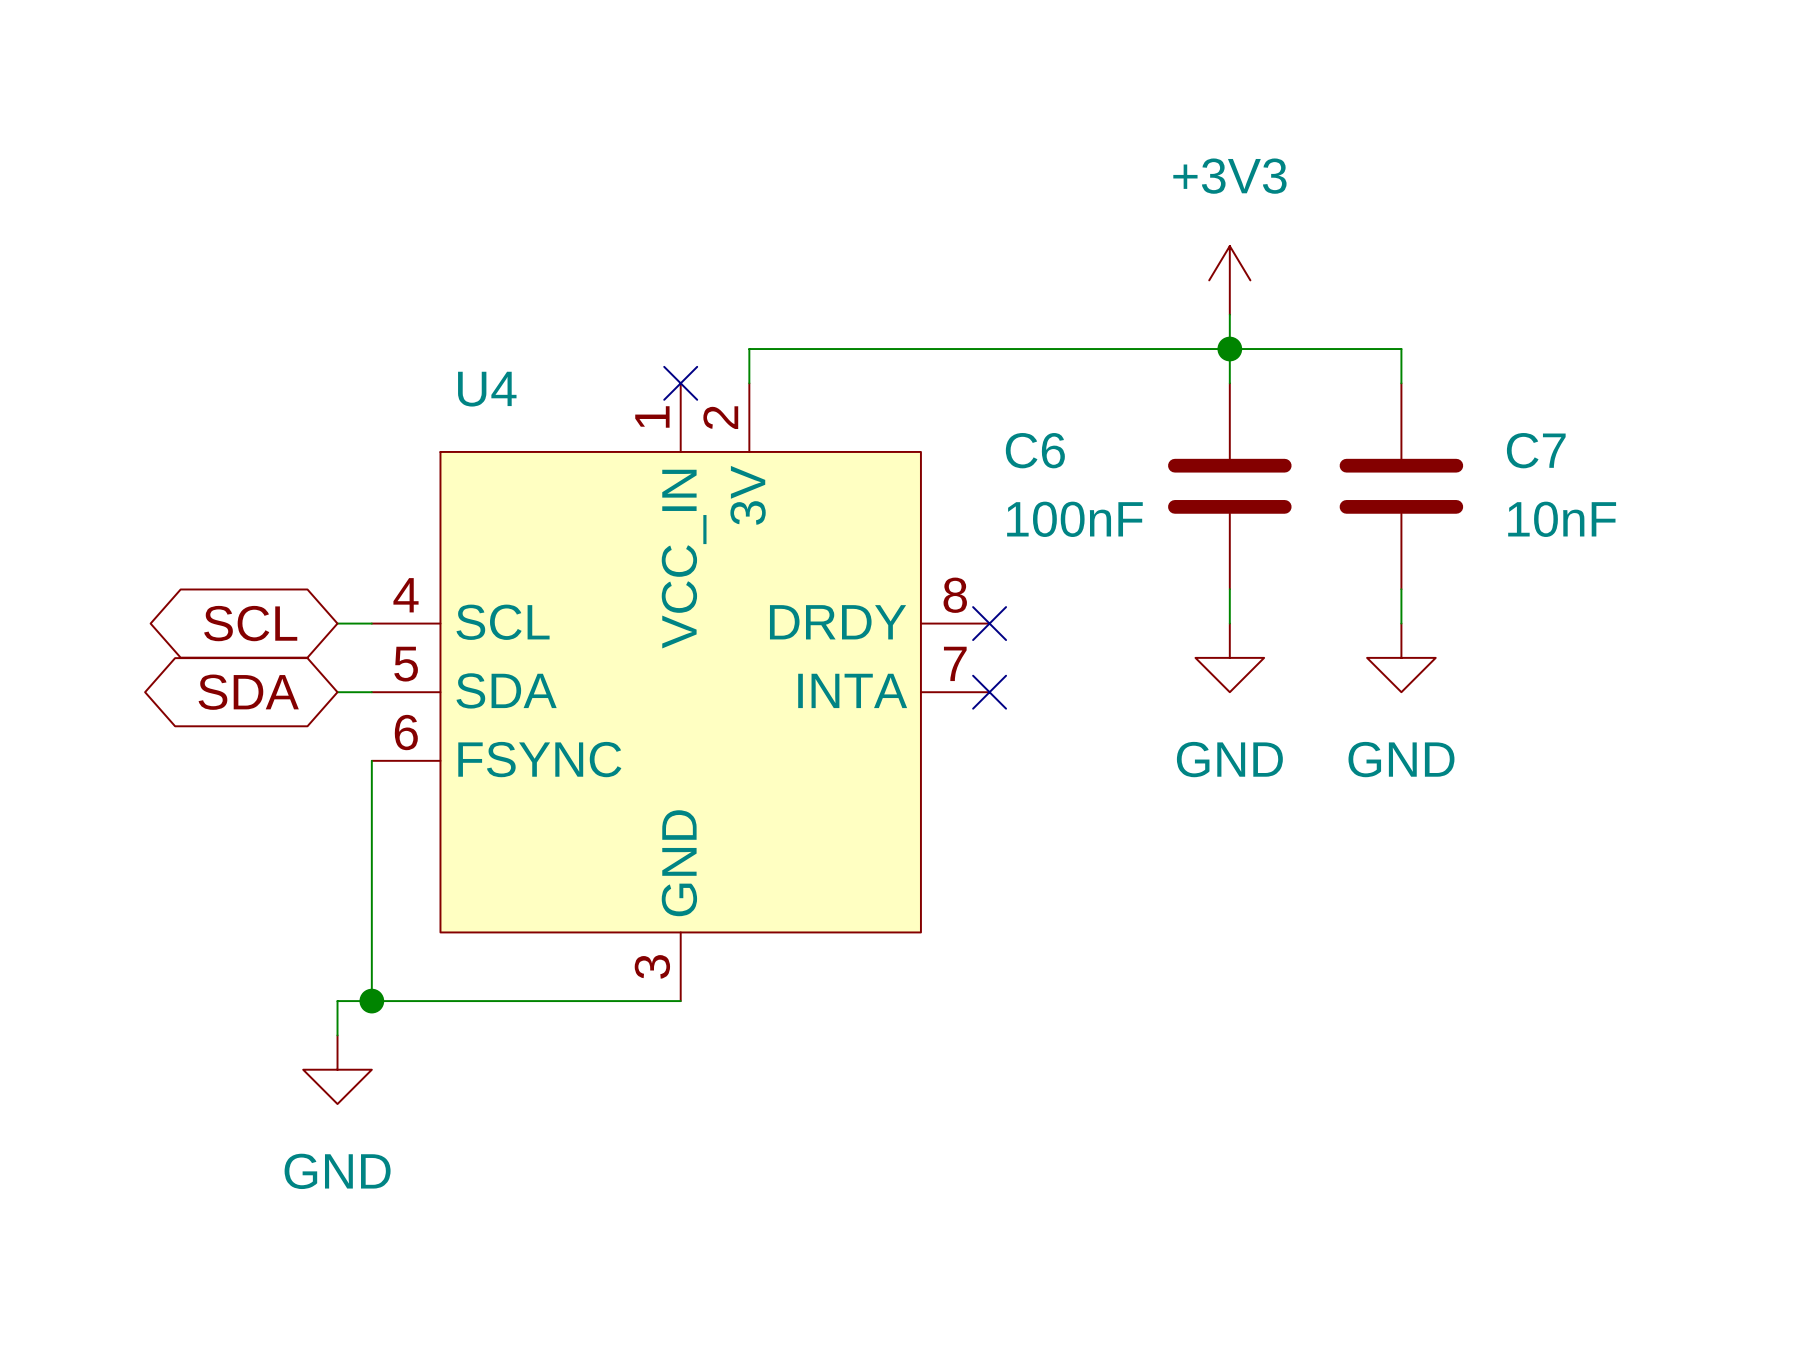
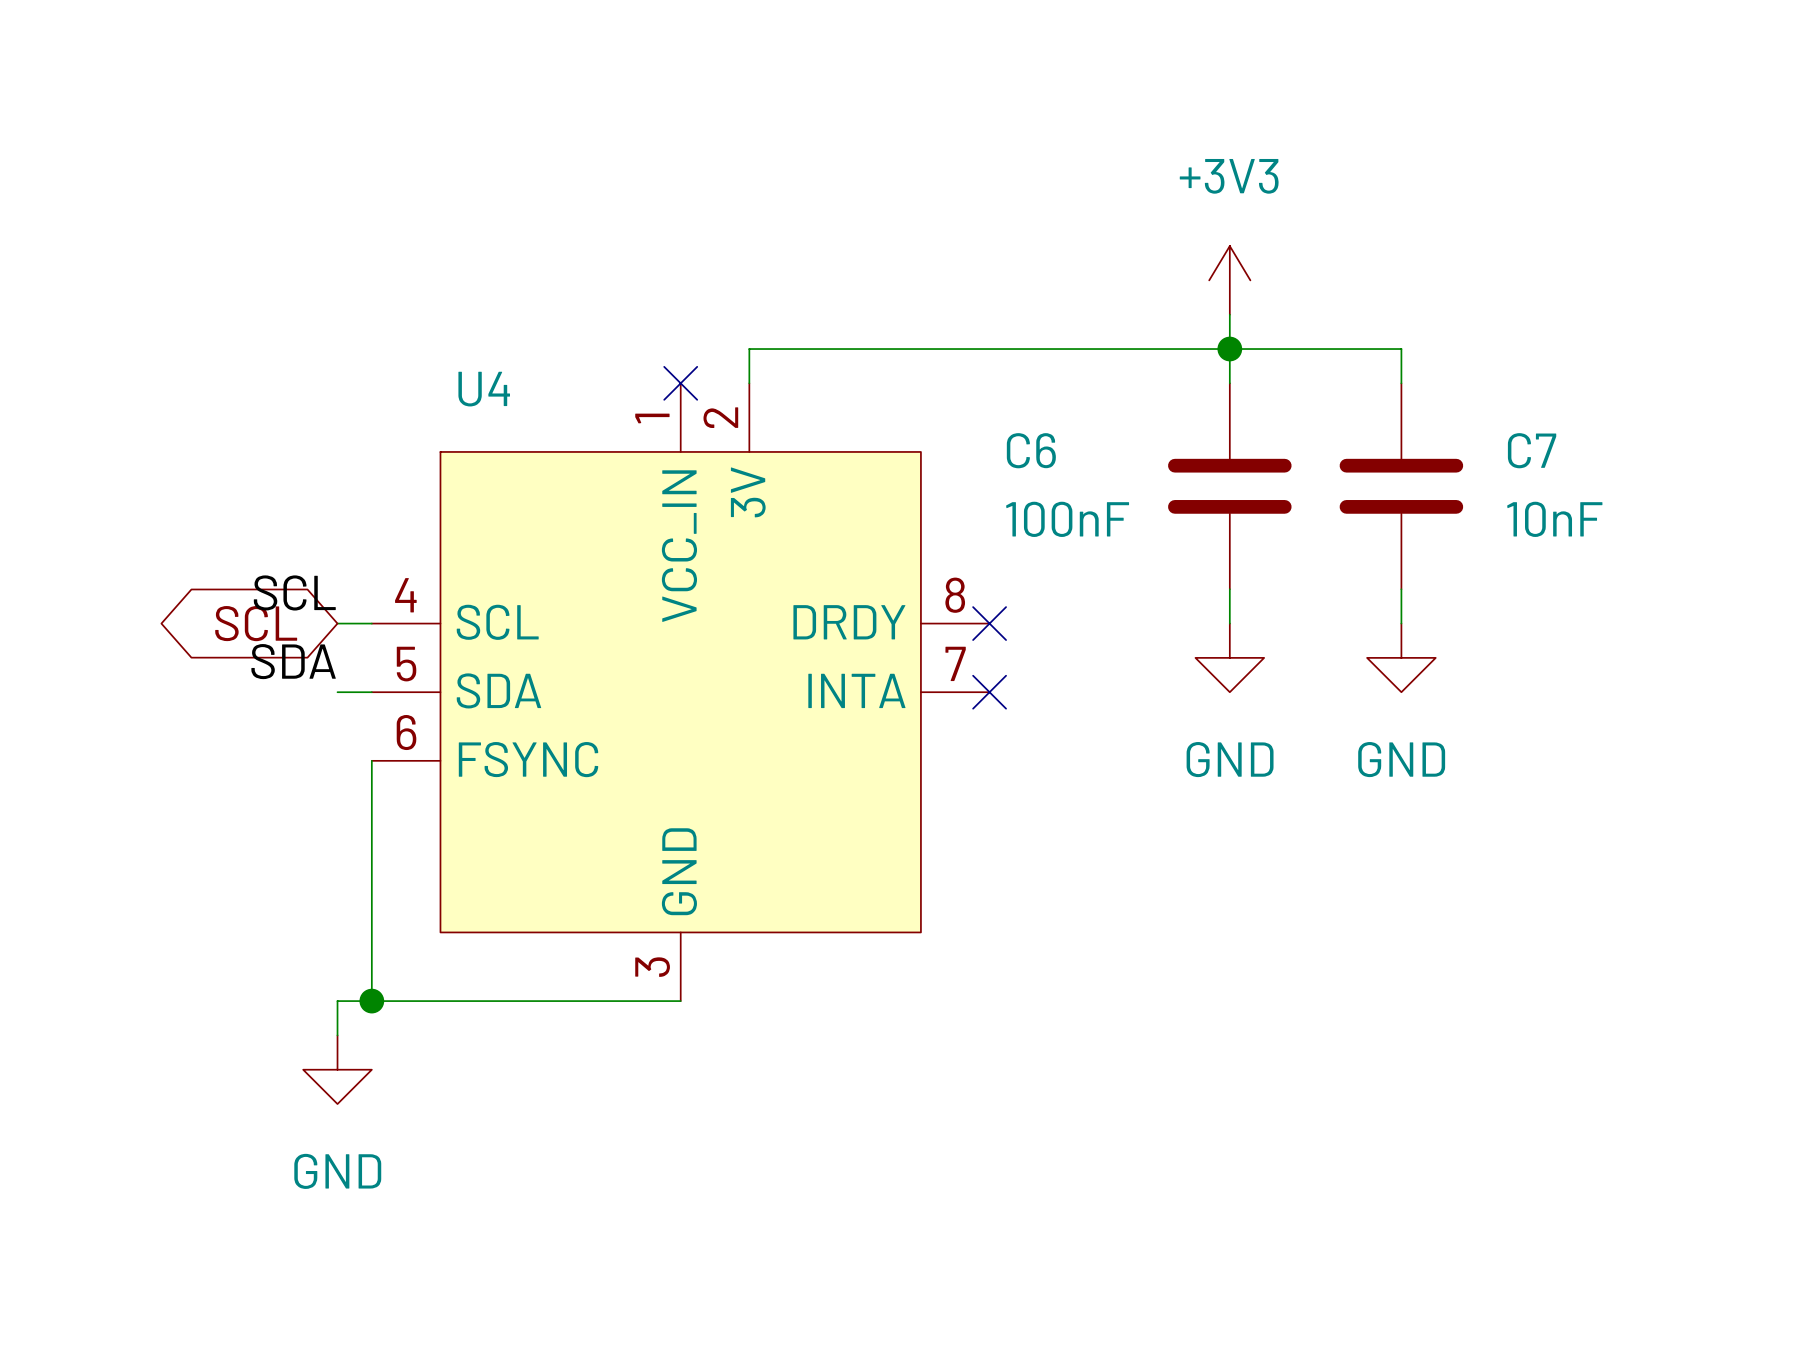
label: none -> SCL (294, 592)
label: none -> SDA (293, 661)
global label: SDA (248, 692) -> none

